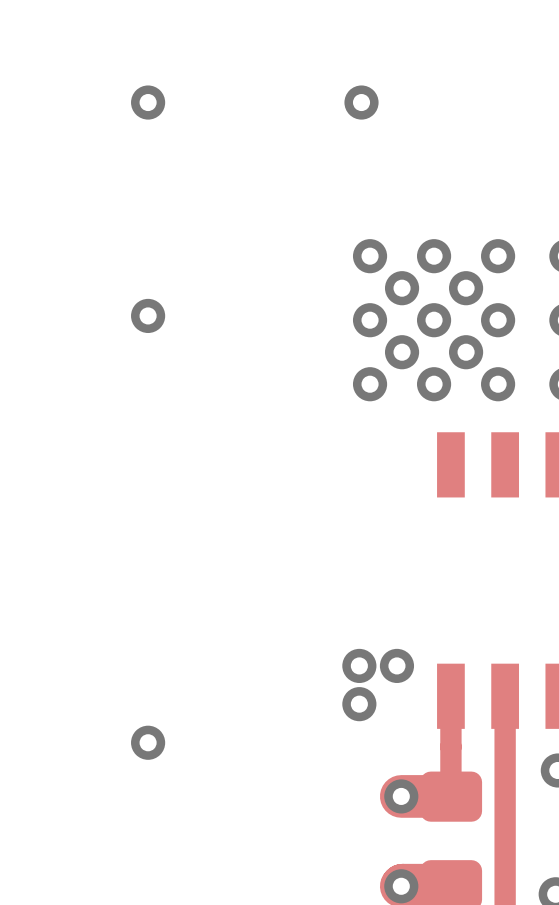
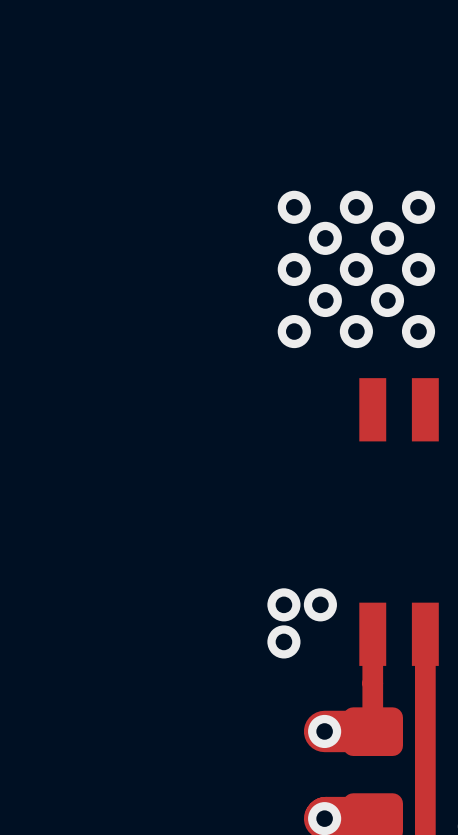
via: (148, 102) -> none
via: (361, 102) -> none
via: (148, 315) -> none
via: (148, 742) -> none

